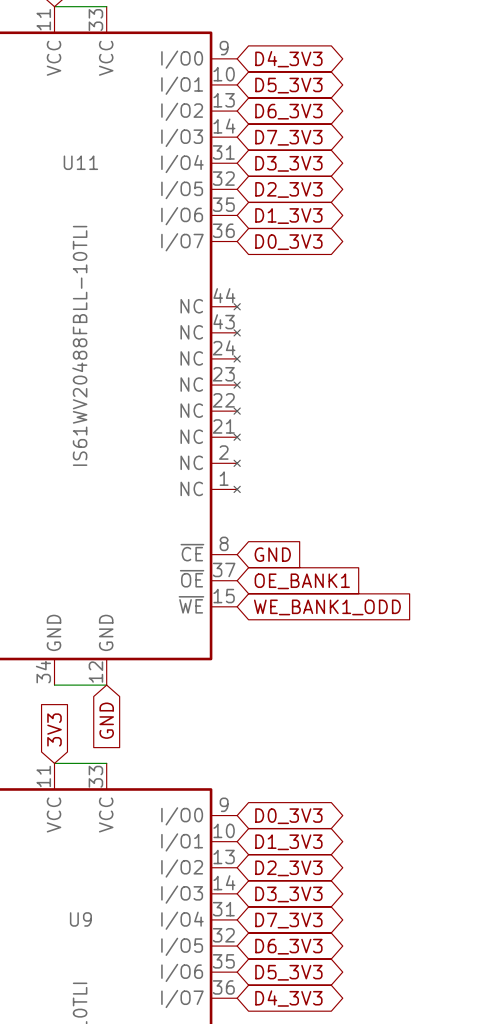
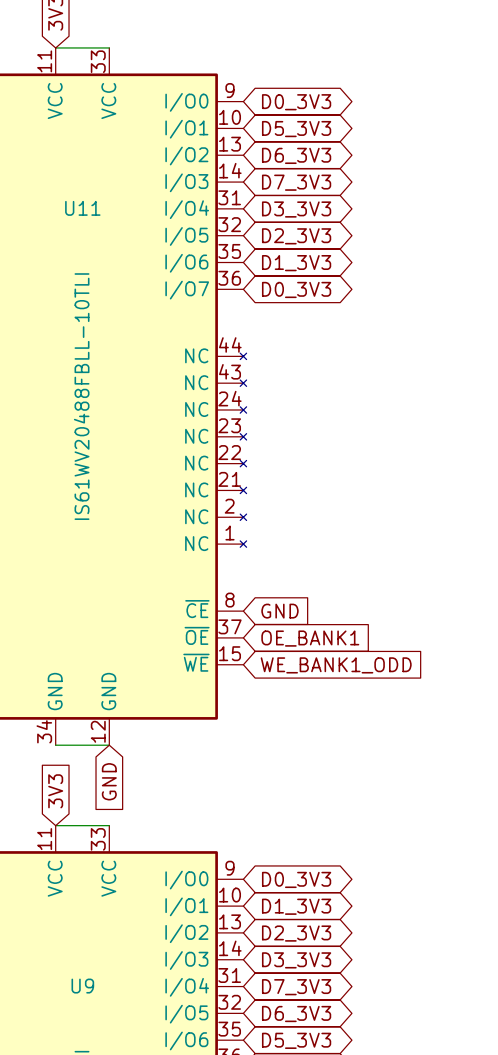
global label: D4_3V3 (288, 59) -> D0_3V3 (296, 102)

